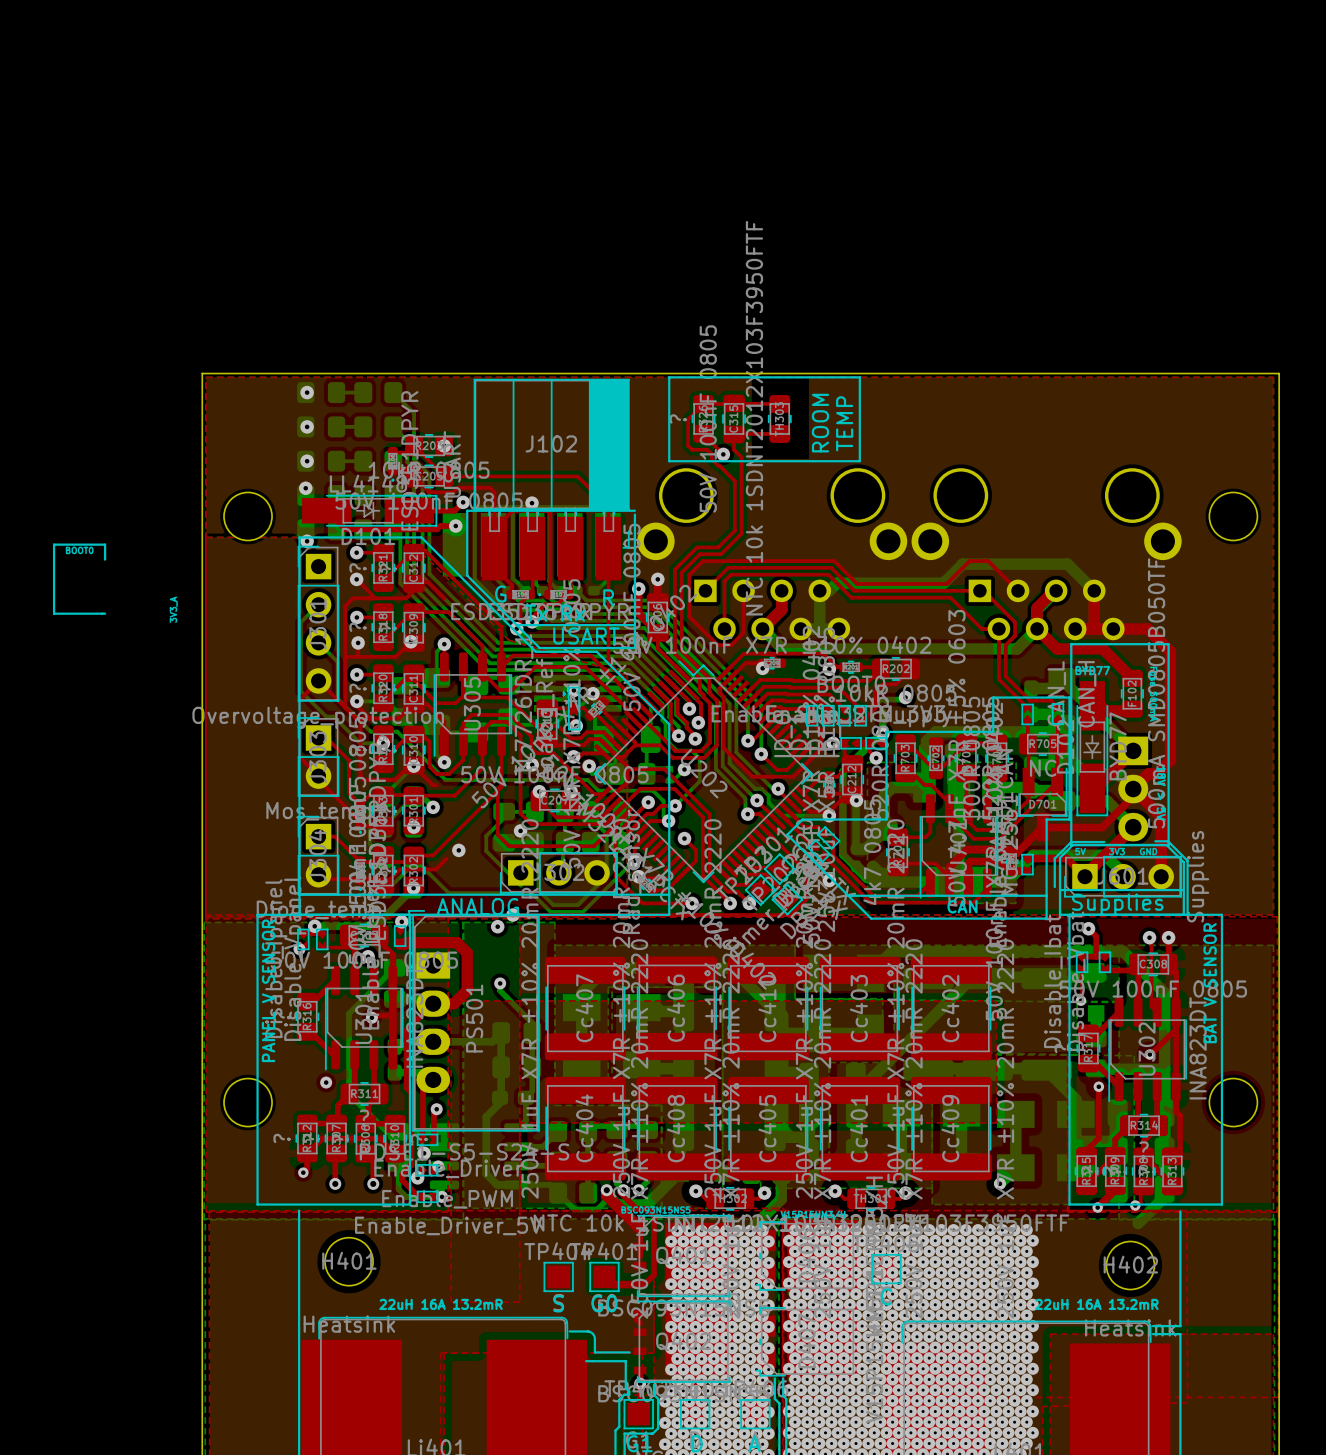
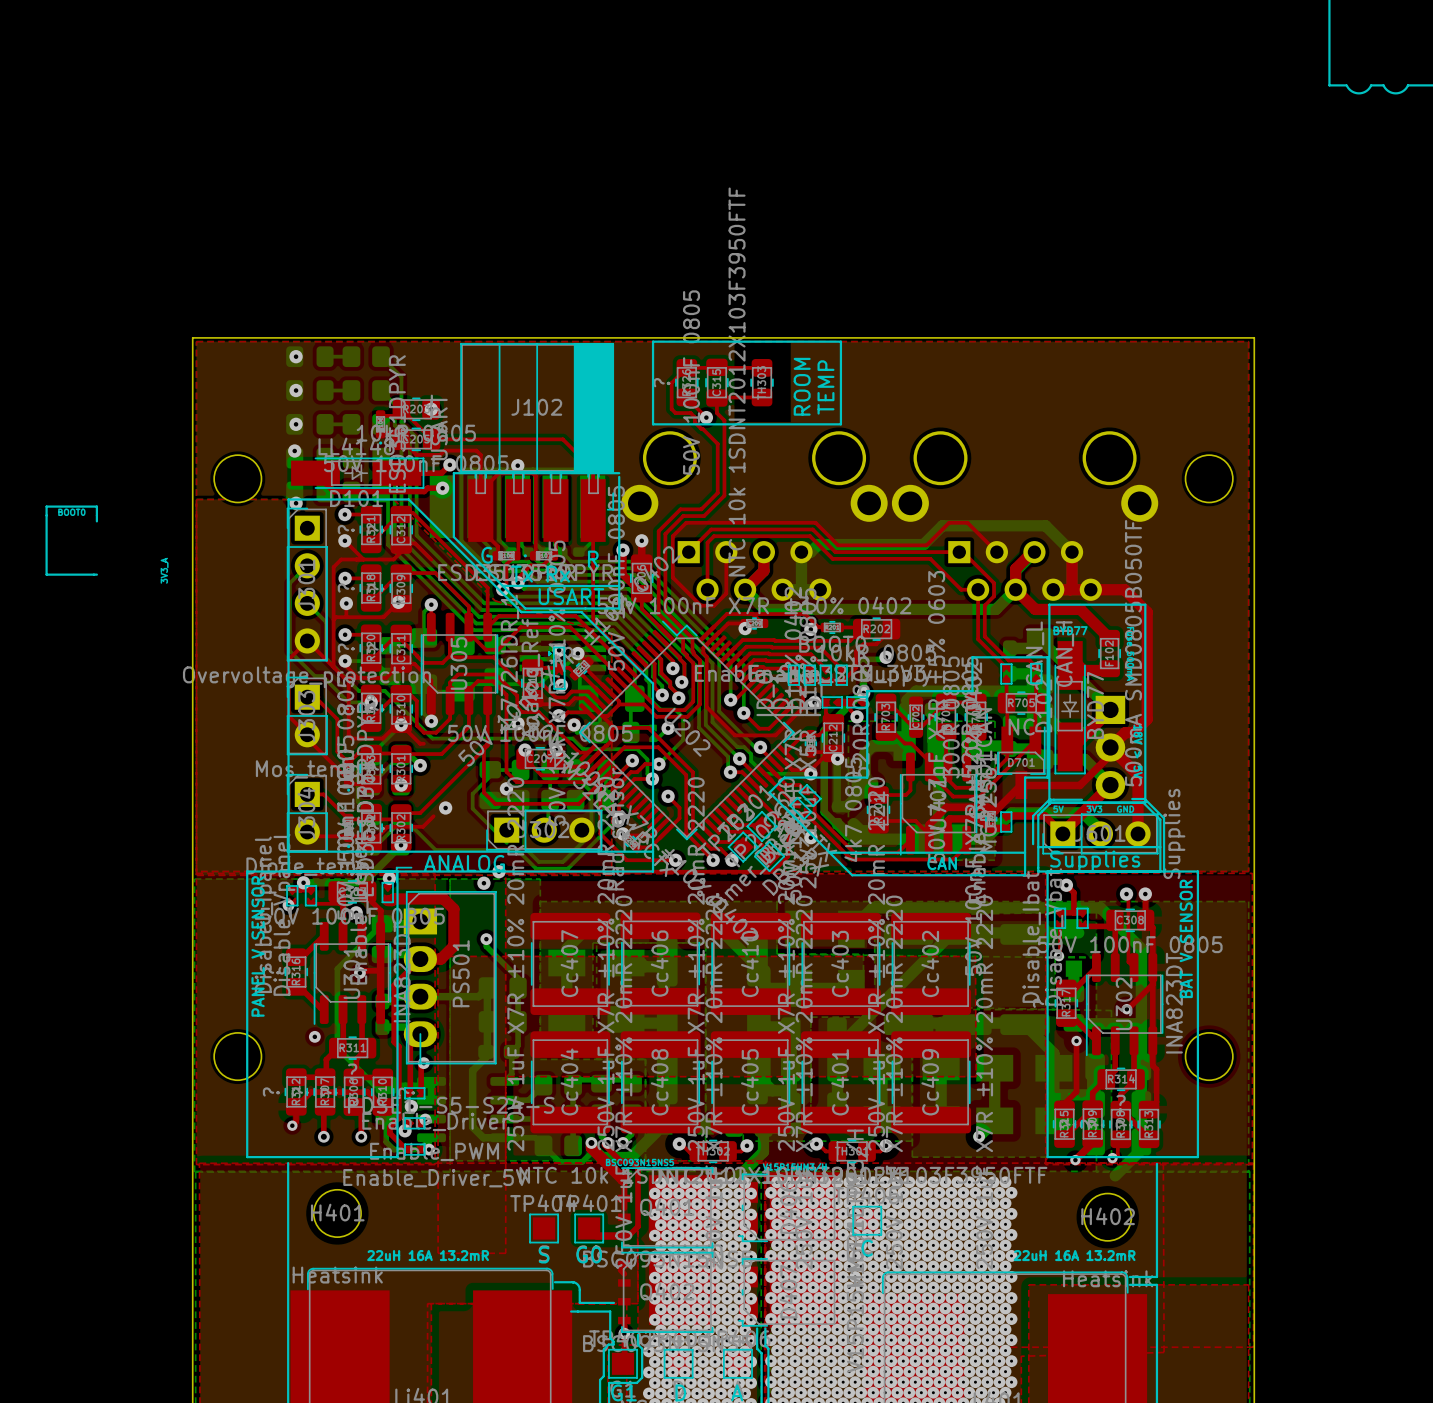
PS501 footprint: [408, 910, 540, 1132] -> [395, 866, 497, 1065]

